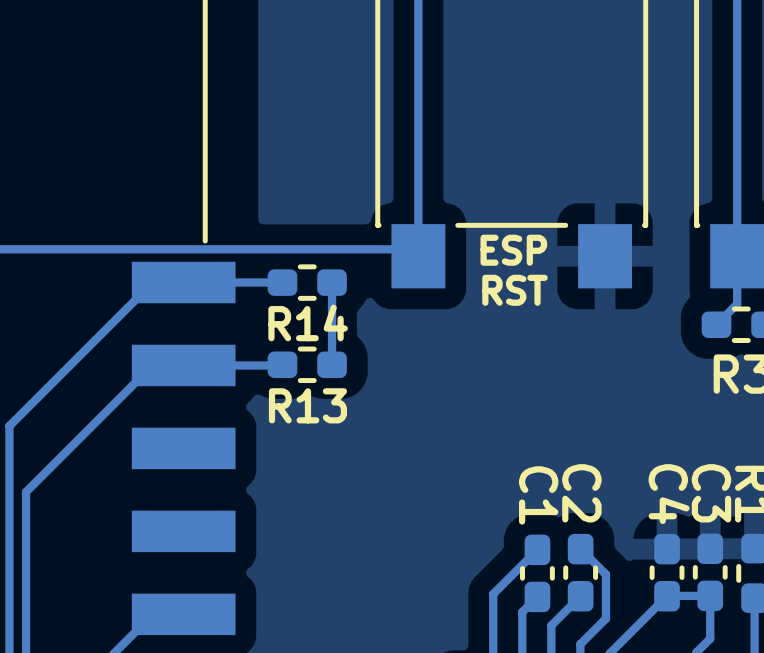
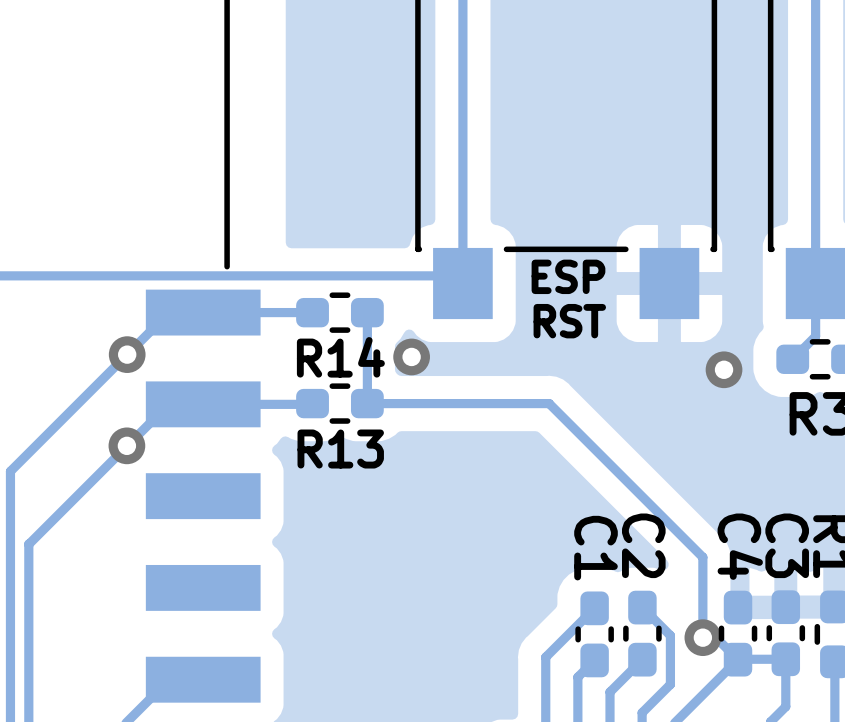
via: none -> (127, 354)
via: none -> (411, 356)
via: none -> (724, 369)
track: none -> (367, 403) (549, 403) (702, 557) (702, 637) (716, 637) (738, 659)
via: none -> (126, 445)
via: none -> (702, 637)

